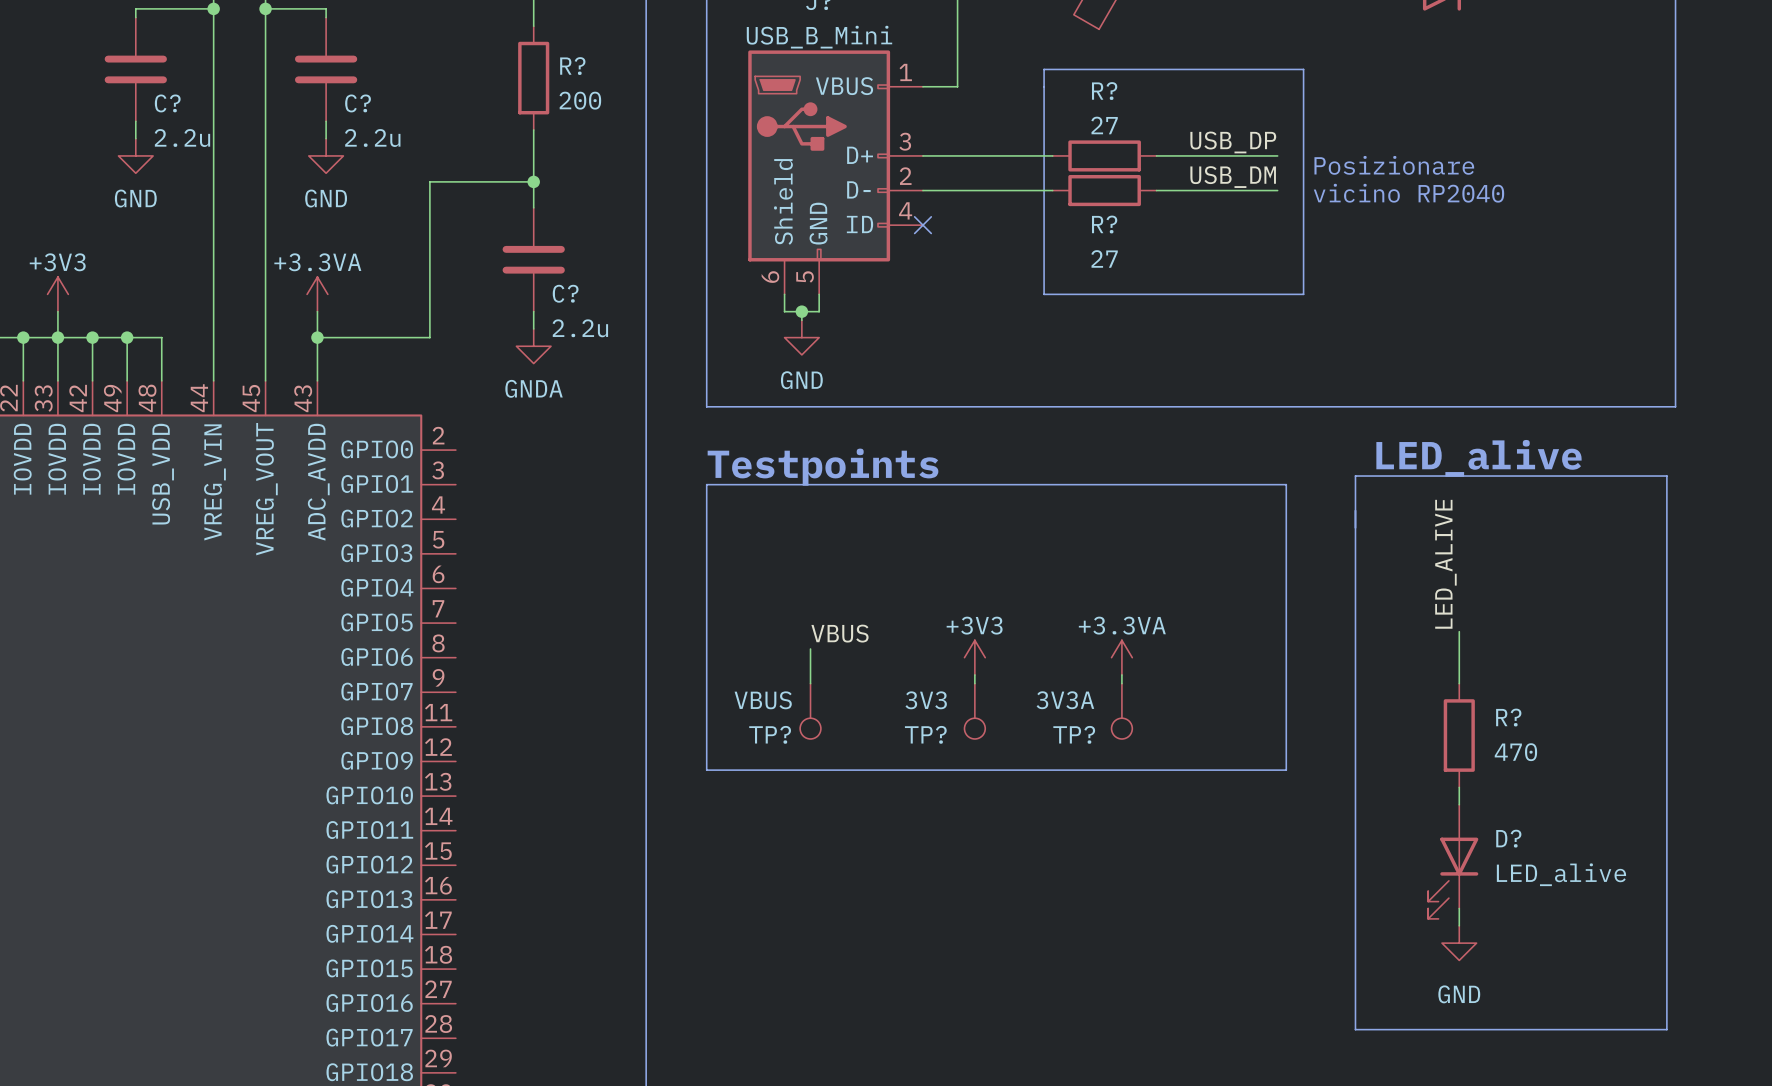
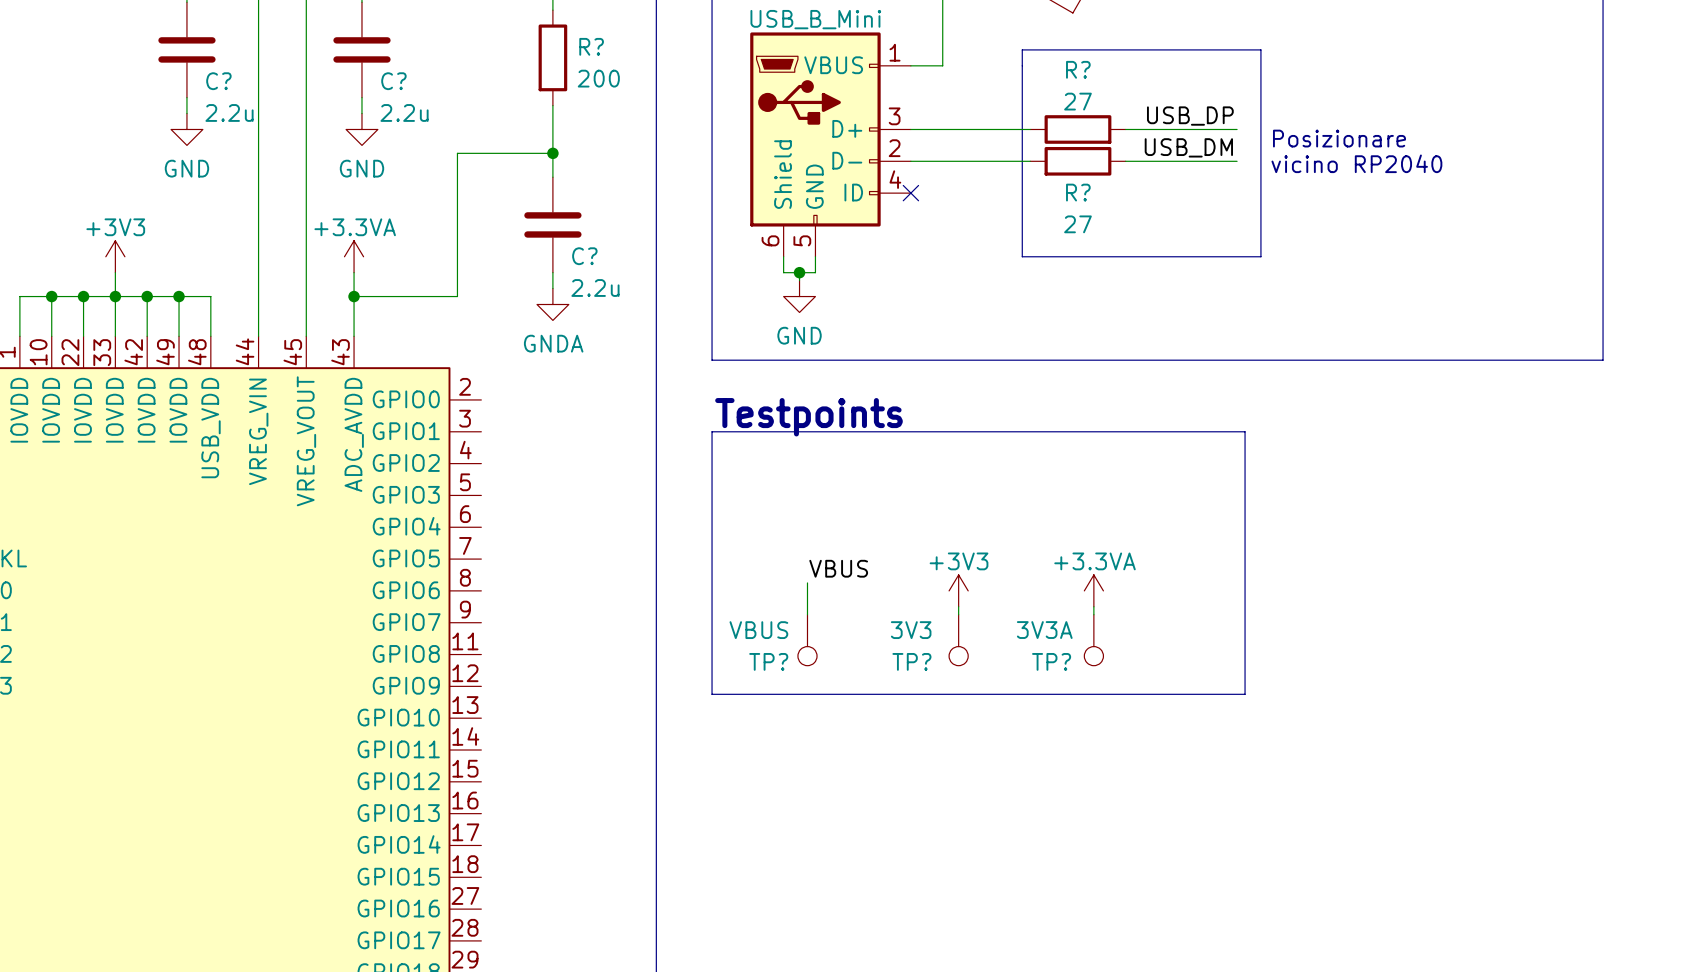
text: LED_alive (1478, 458) -> none
line: (1355, 476) (1666, 476) (1666, 1029) (1355, 1029) (1355, 476) -> none
label: LED_ALIVE (1445, 564) -> none
wire: (1459, 631) (1459, 683) -> none
R?: 470 (1459, 735) -> none
wire: (1459, 787) (1459, 804) -> none
D?: LED_alive (1453, 861) -> none
wire: (1459, 908) (1459, 925) -> none
power symbol: GND (1459, 943) -> none

